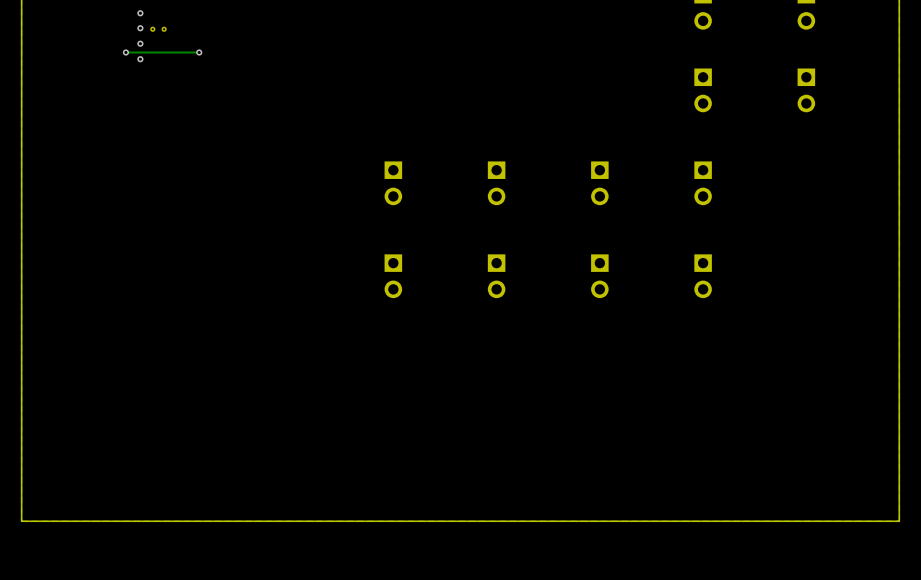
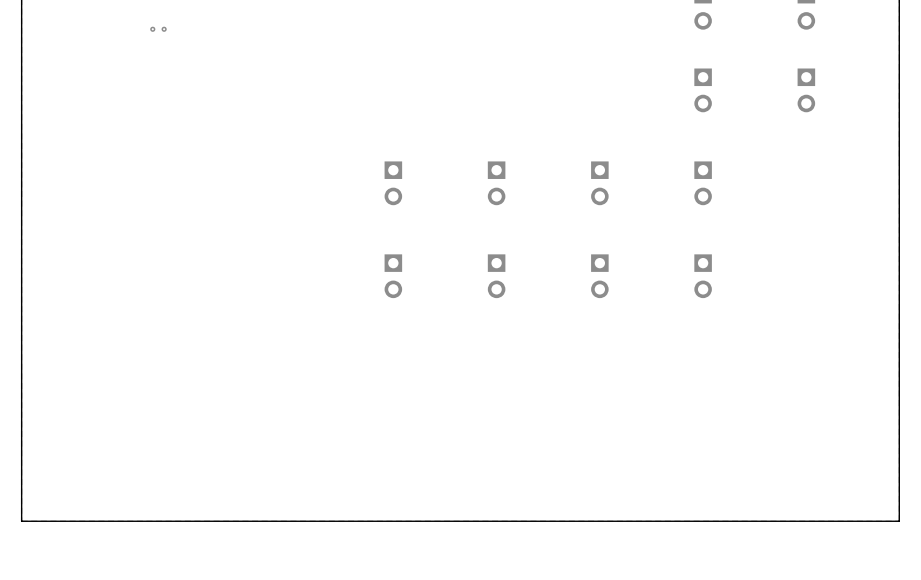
via: (140, 13) -> none
via: (140, 28) -> none
via: (140, 43) -> none
via: (125, 52) -> none
track: (199, 52) (125, 52) -> none
via: (199, 52) -> none
via: (140, 59) -> none

